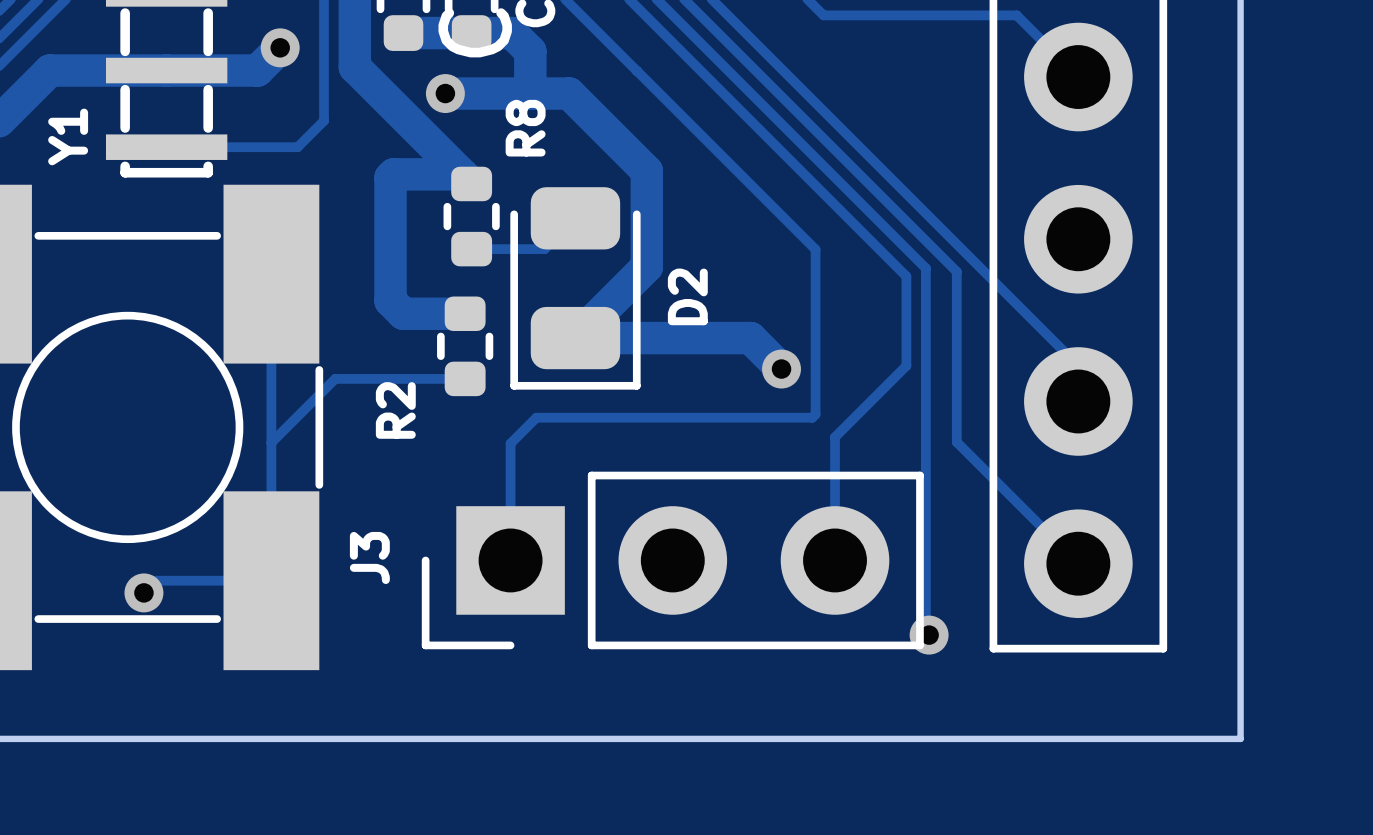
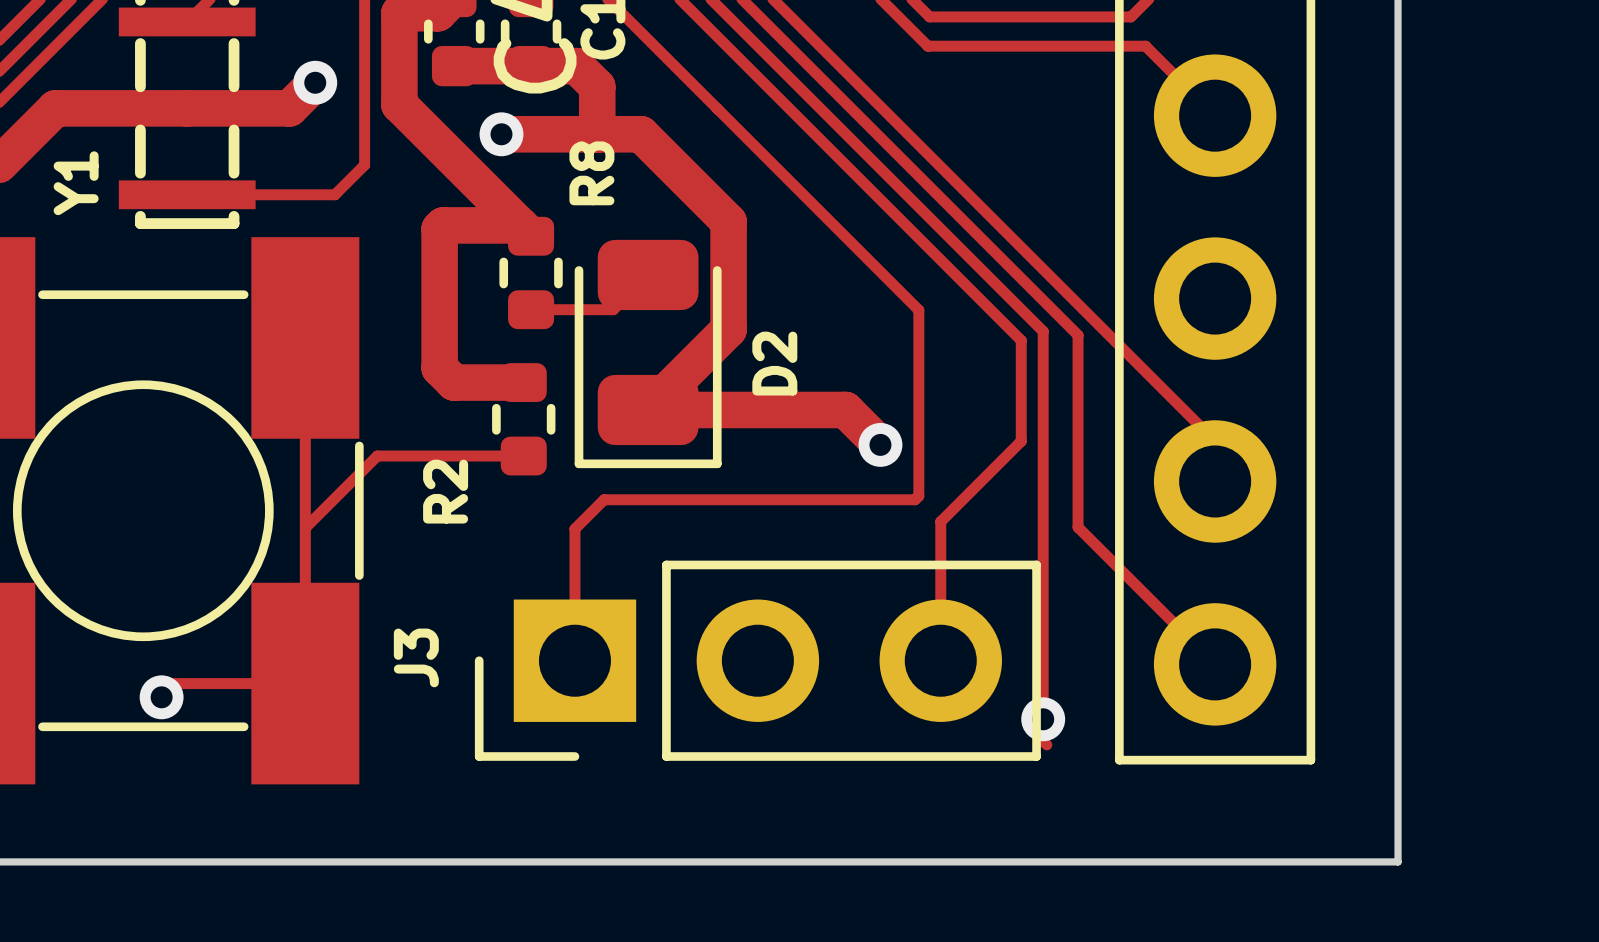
via position: (929, 635) -> (1043, 719)

